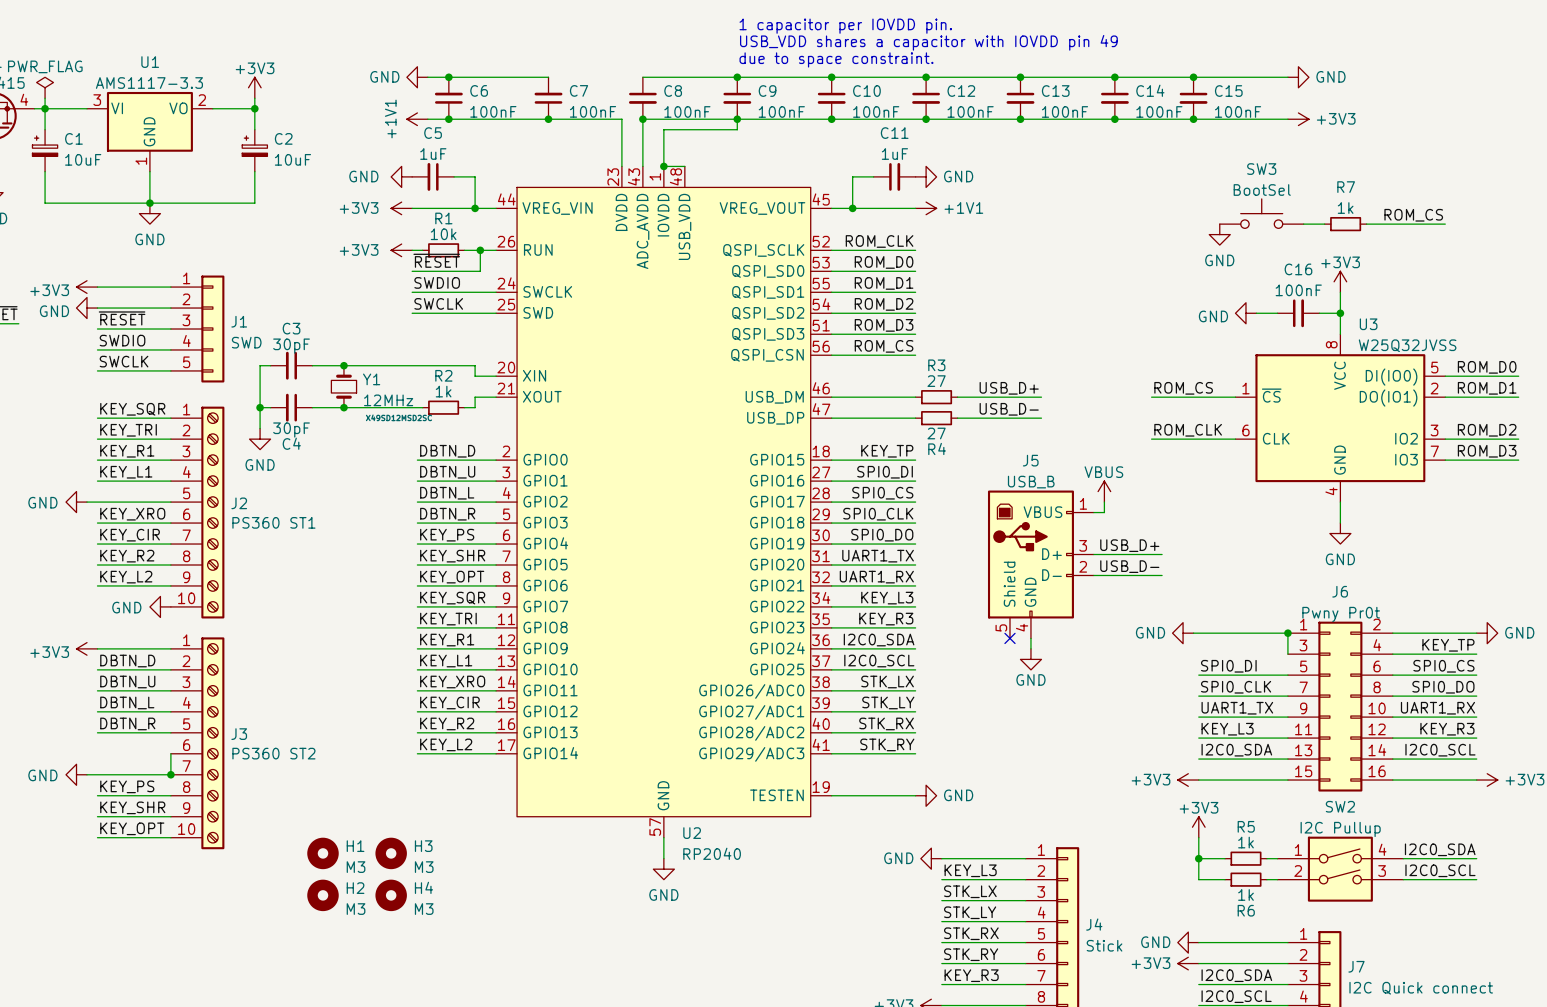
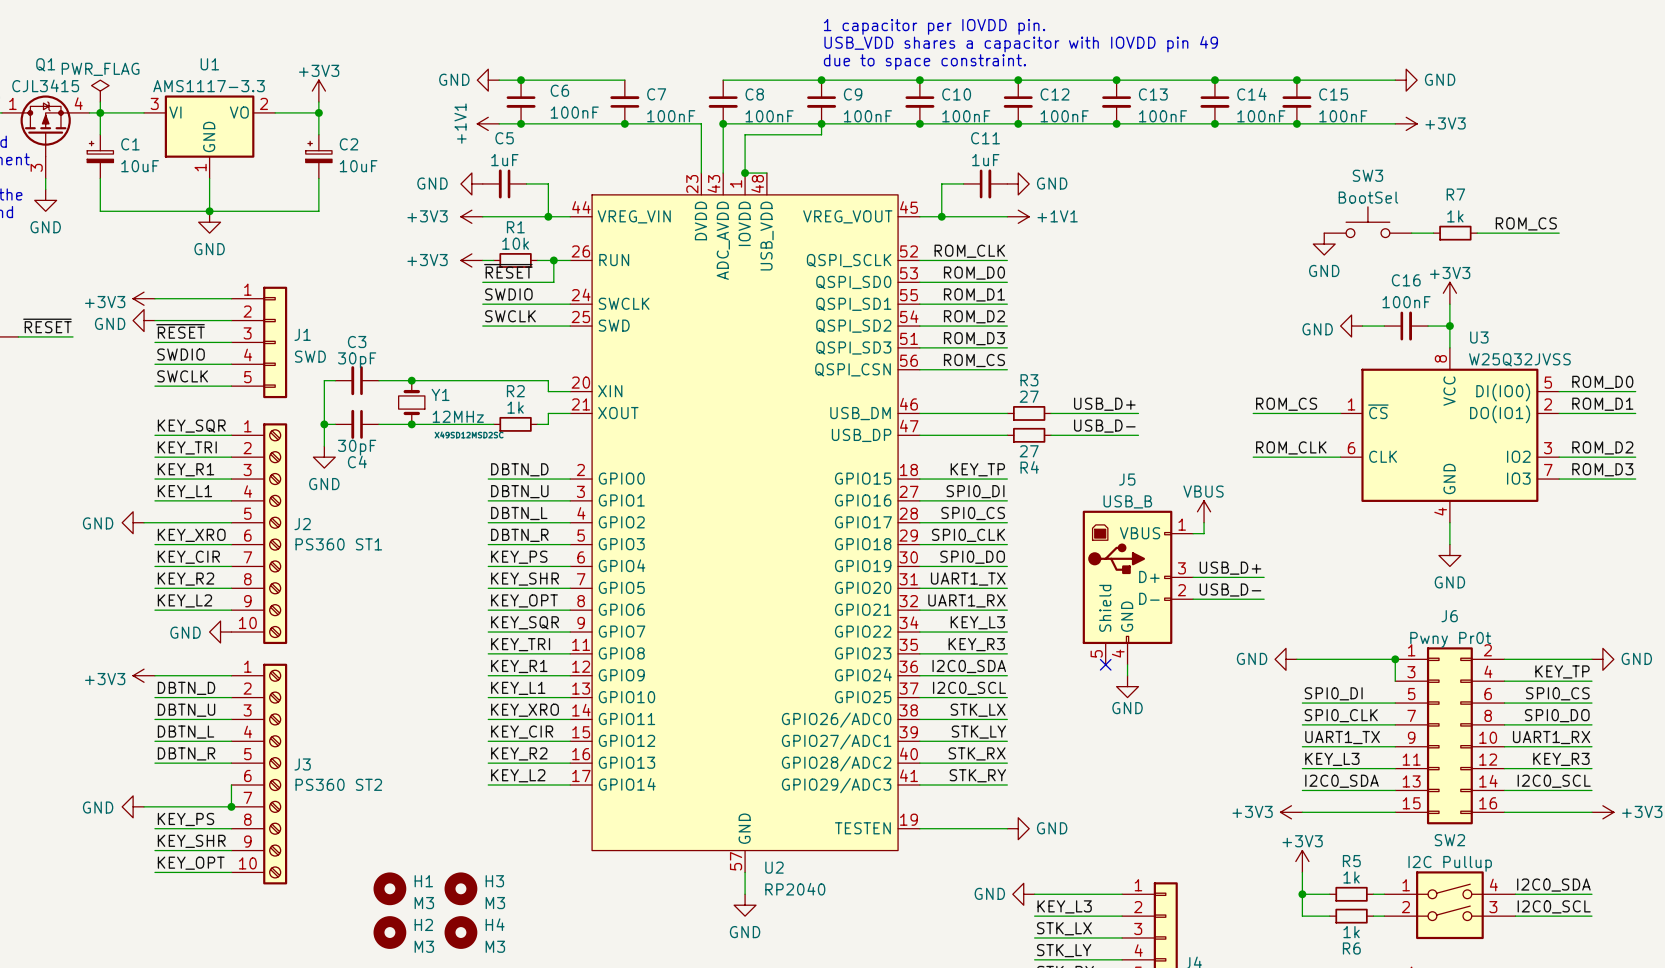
C6 rotation: 0° (448, 98) -> 180° (521, 102)

